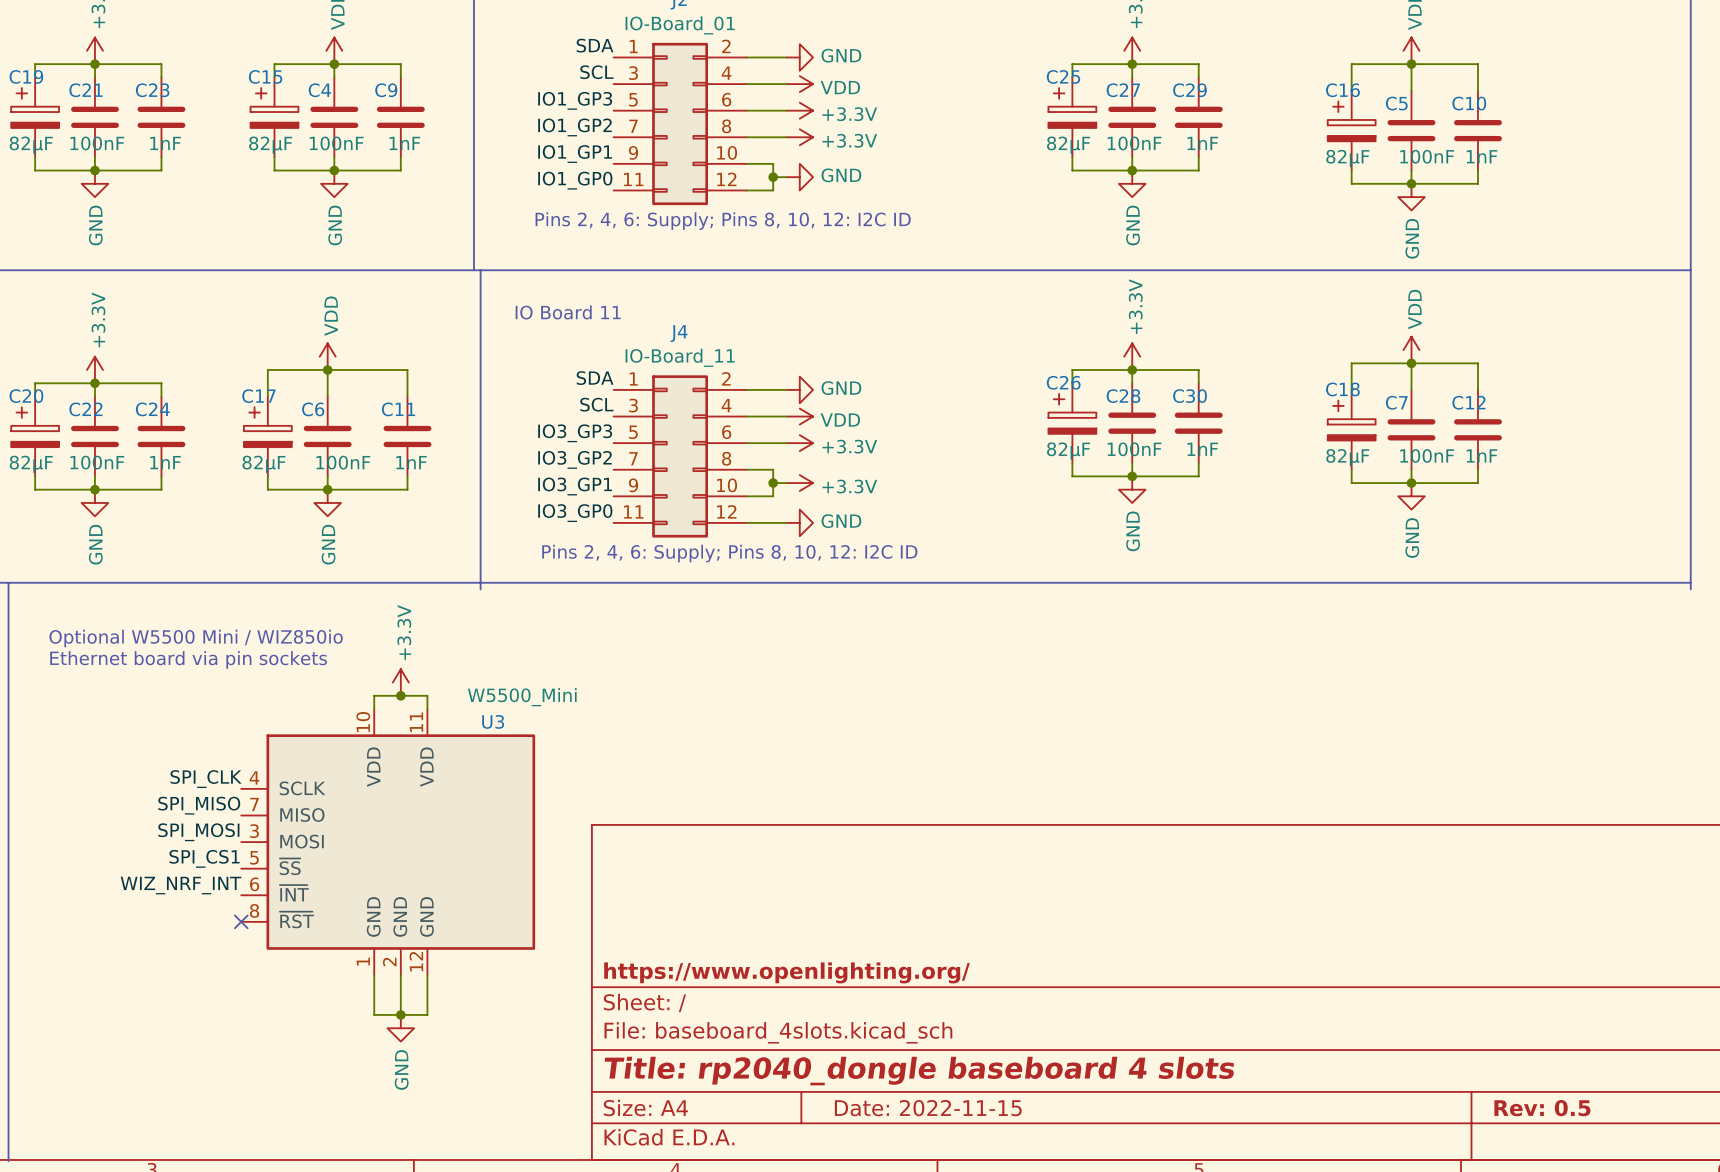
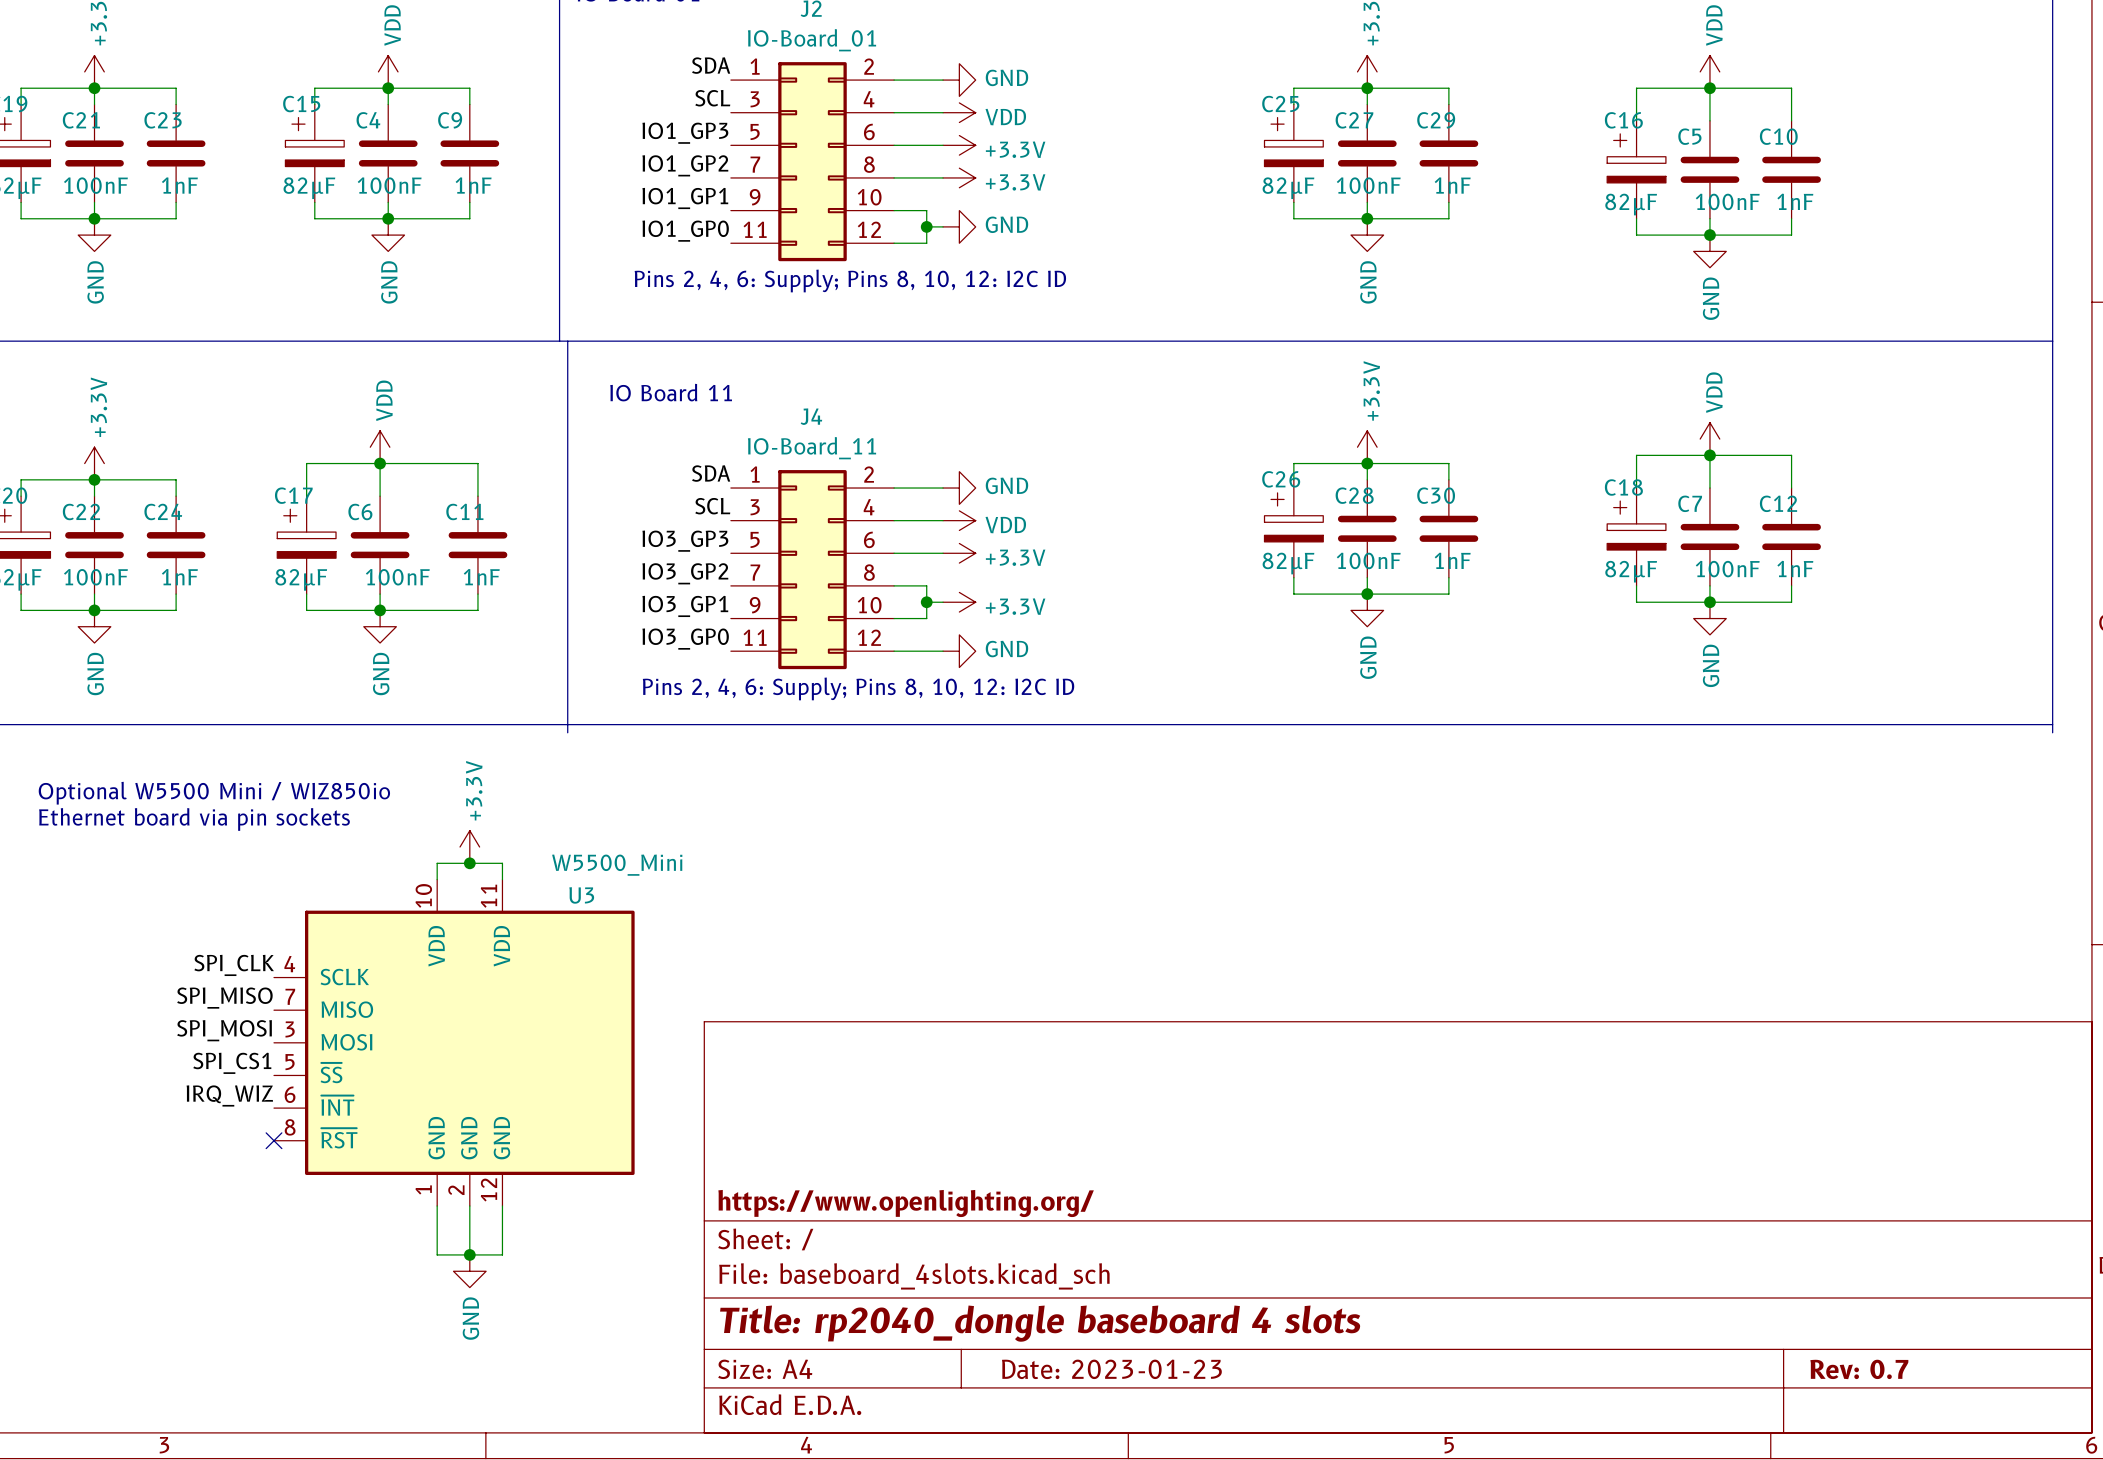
label: WIZ_NRF_INT (181, 885) -> IRQ_WIZ (229, 1095)
title block: Date: 2022-11-15 (928, 1108) -> Date: 2023-01-23 (1111, 1369)
title block: Rev: 0.5 (1542, 1108) -> Rev: 0.7 (1859, 1369)

